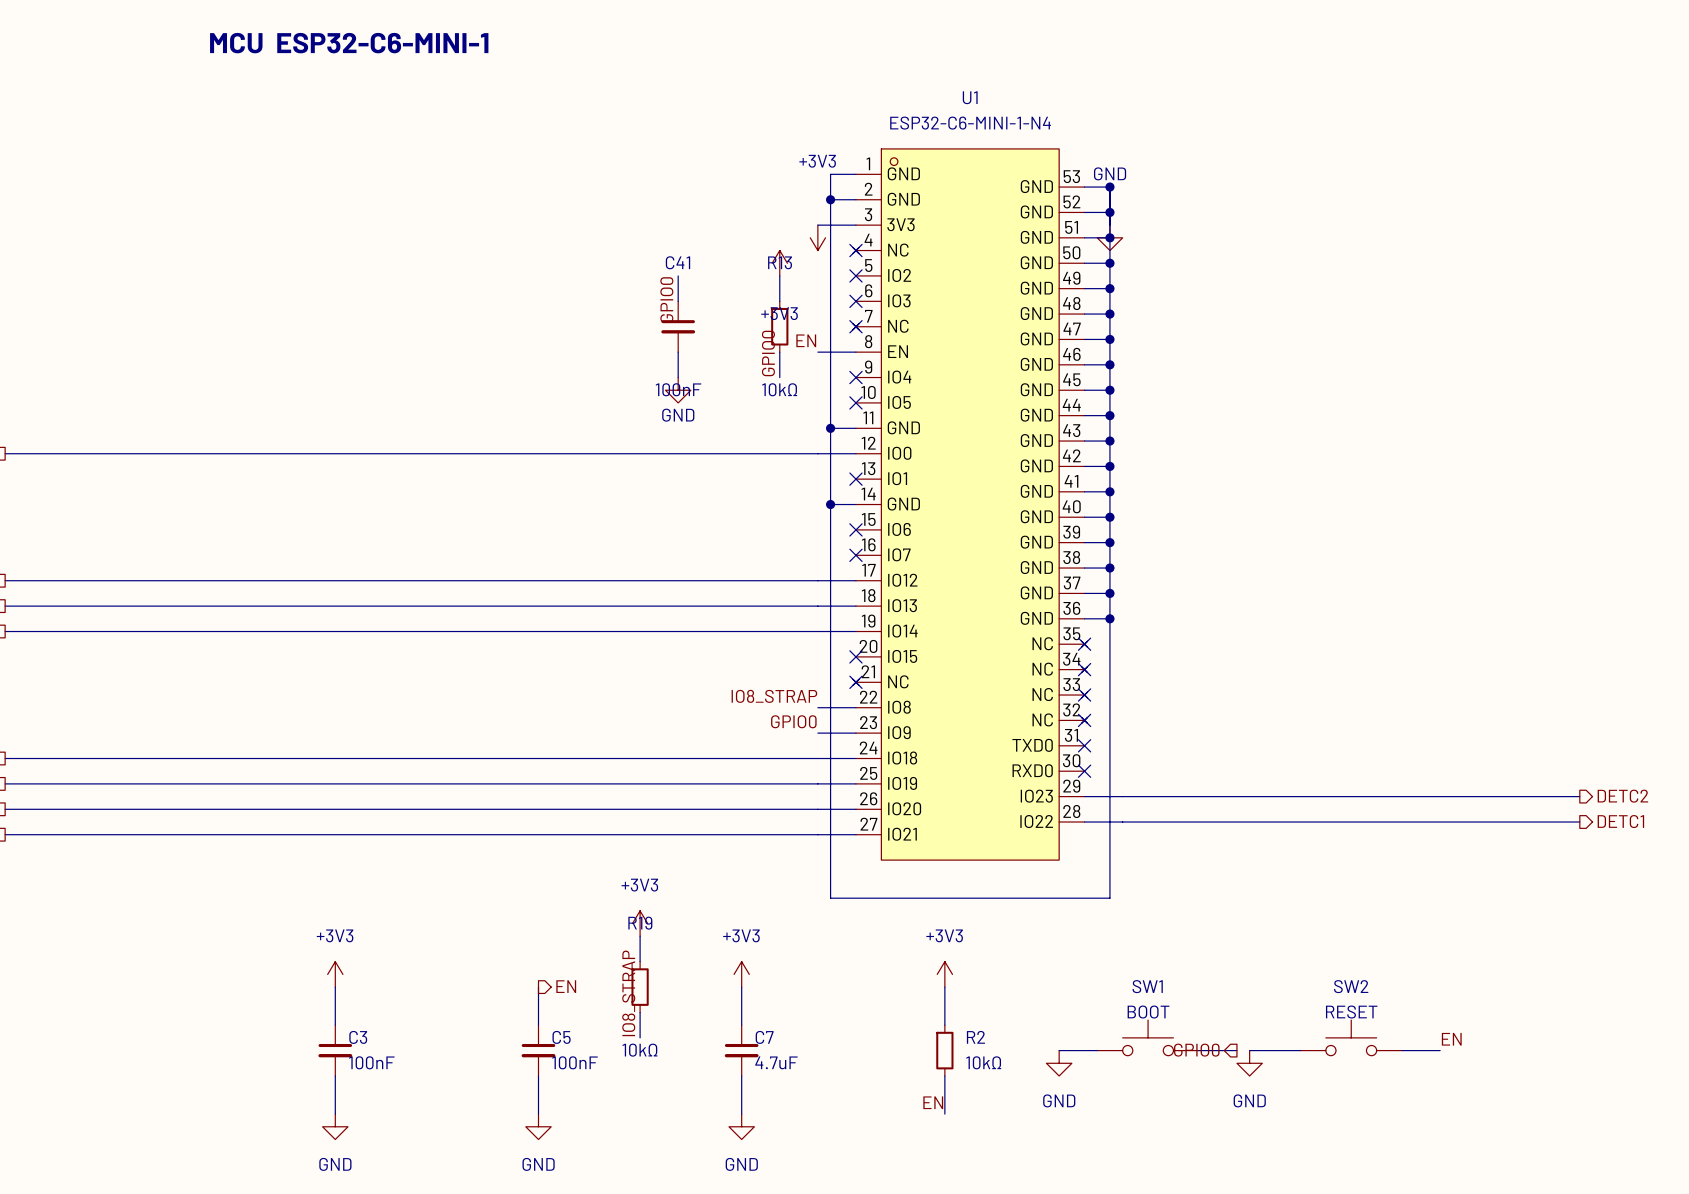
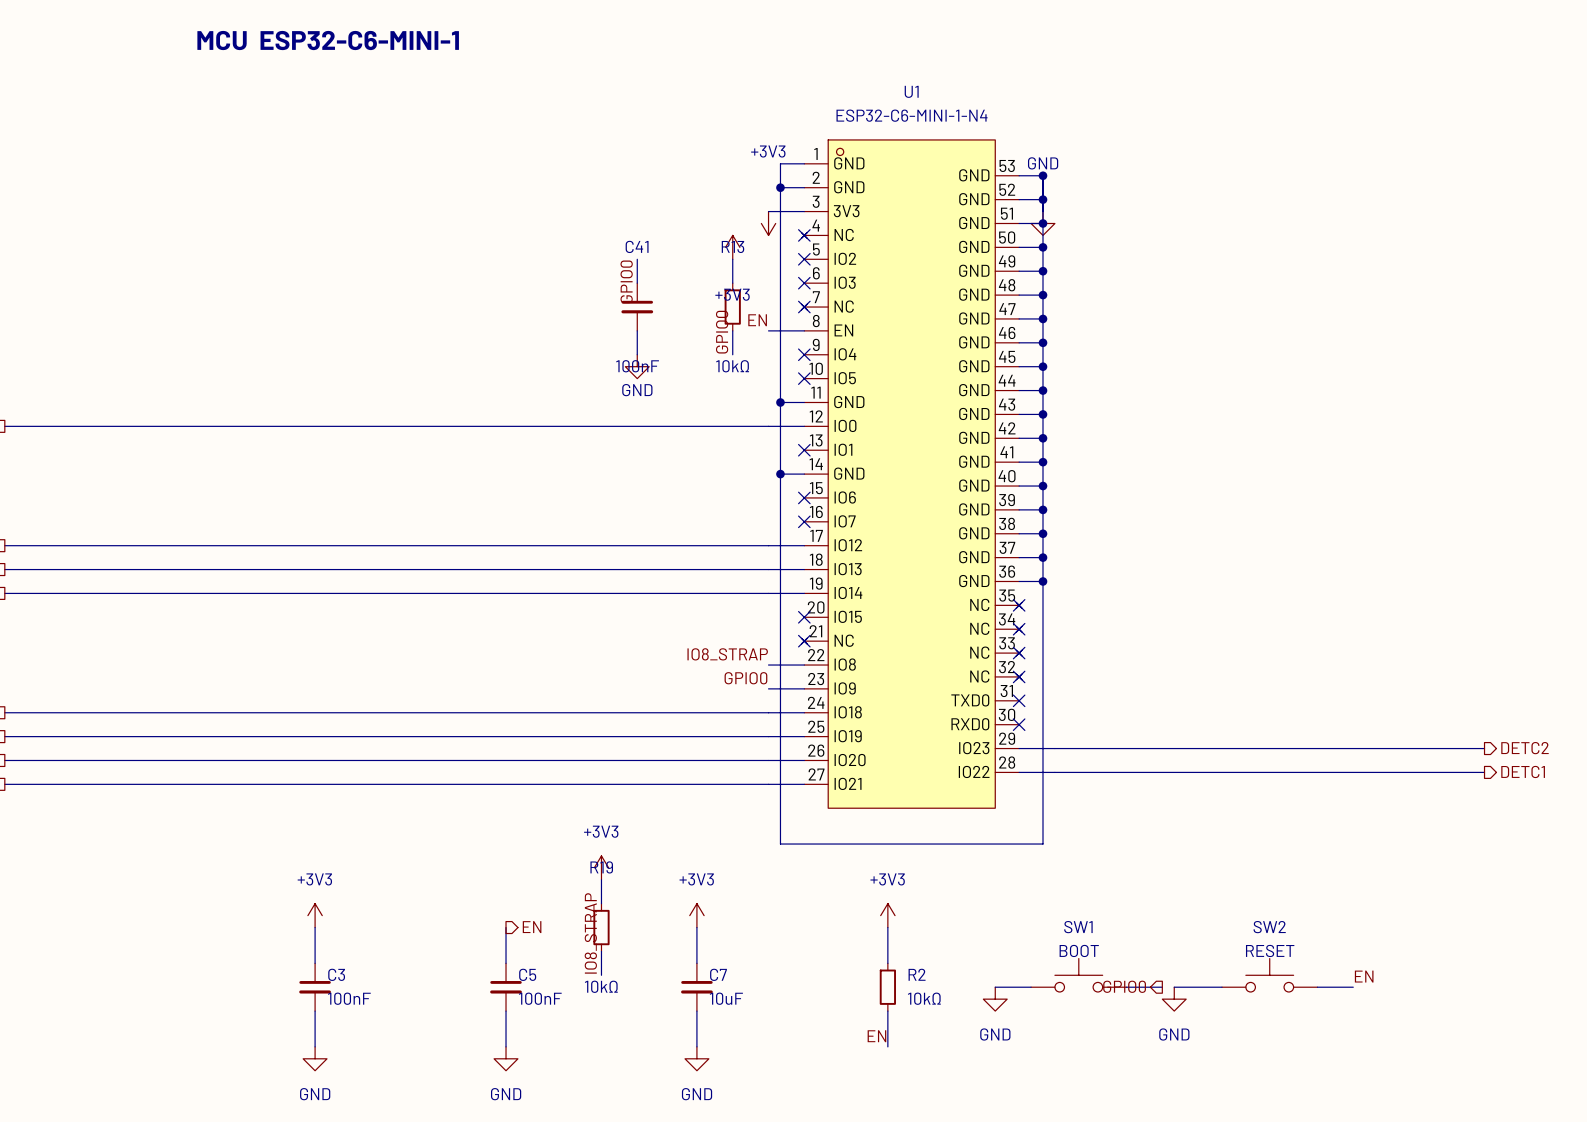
C7 value: 4.7uF (776, 1062) -> 10uF (726, 998)

